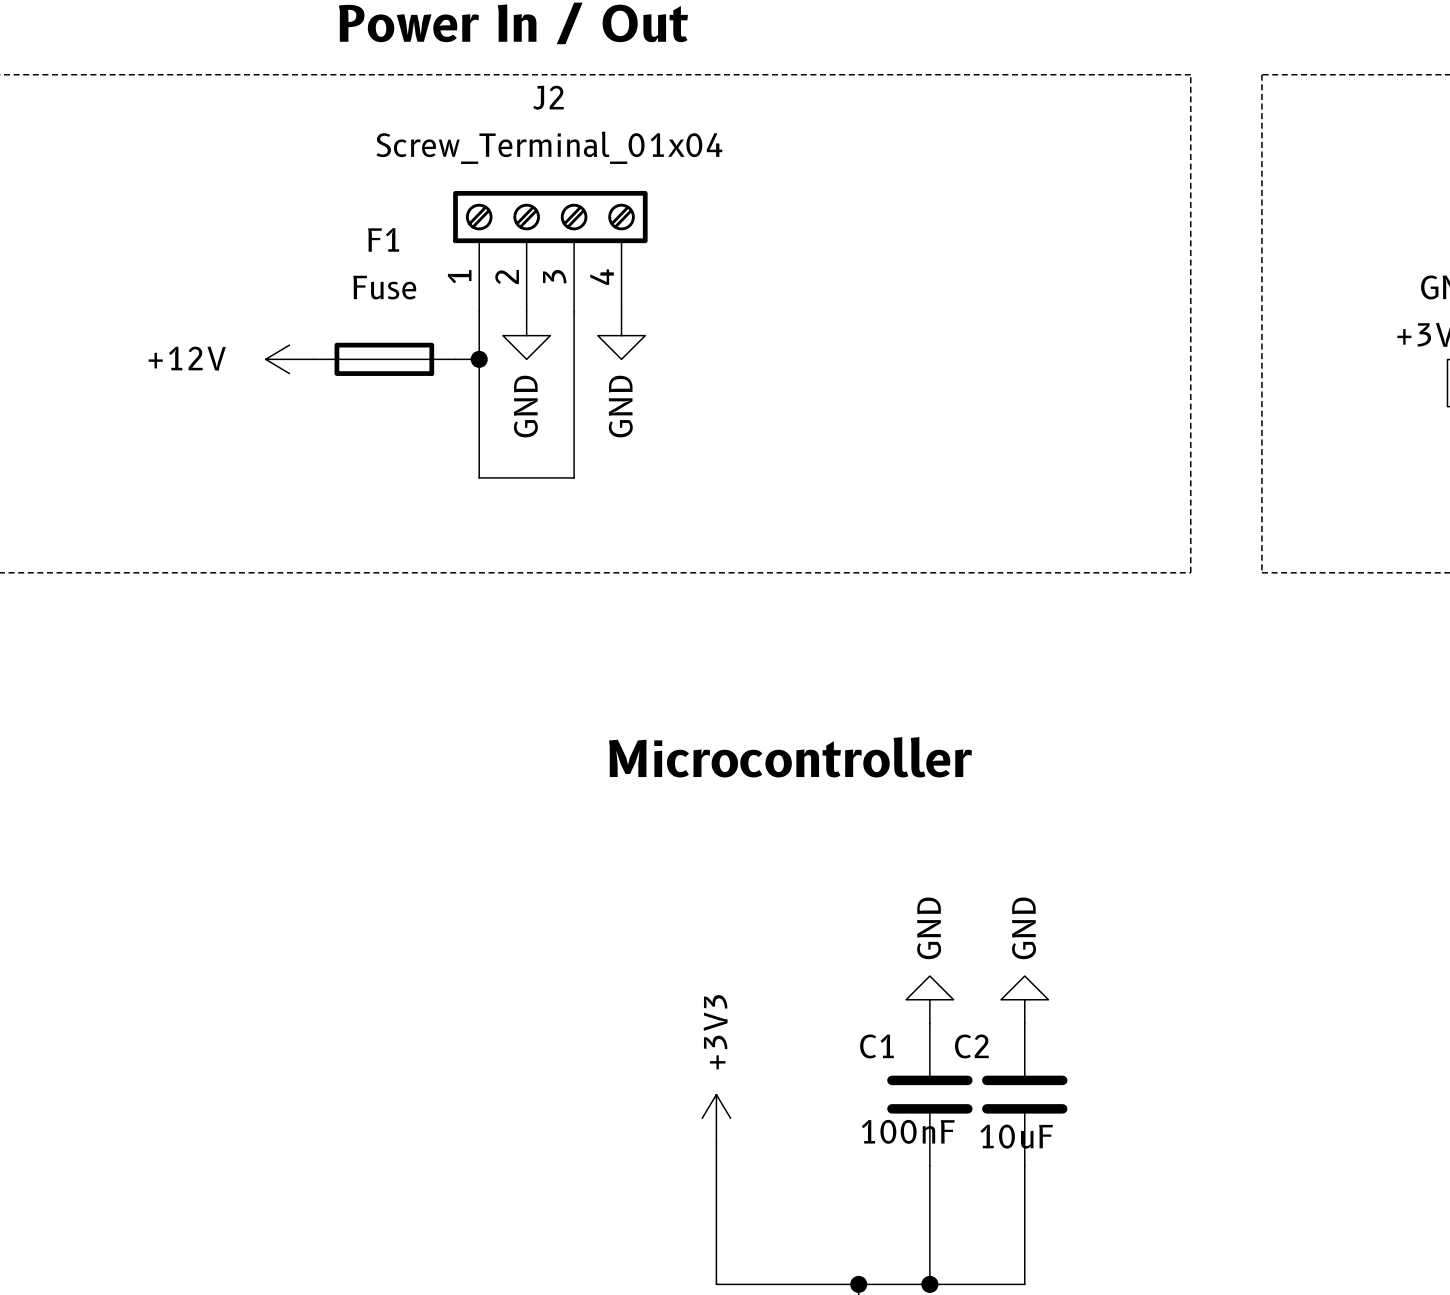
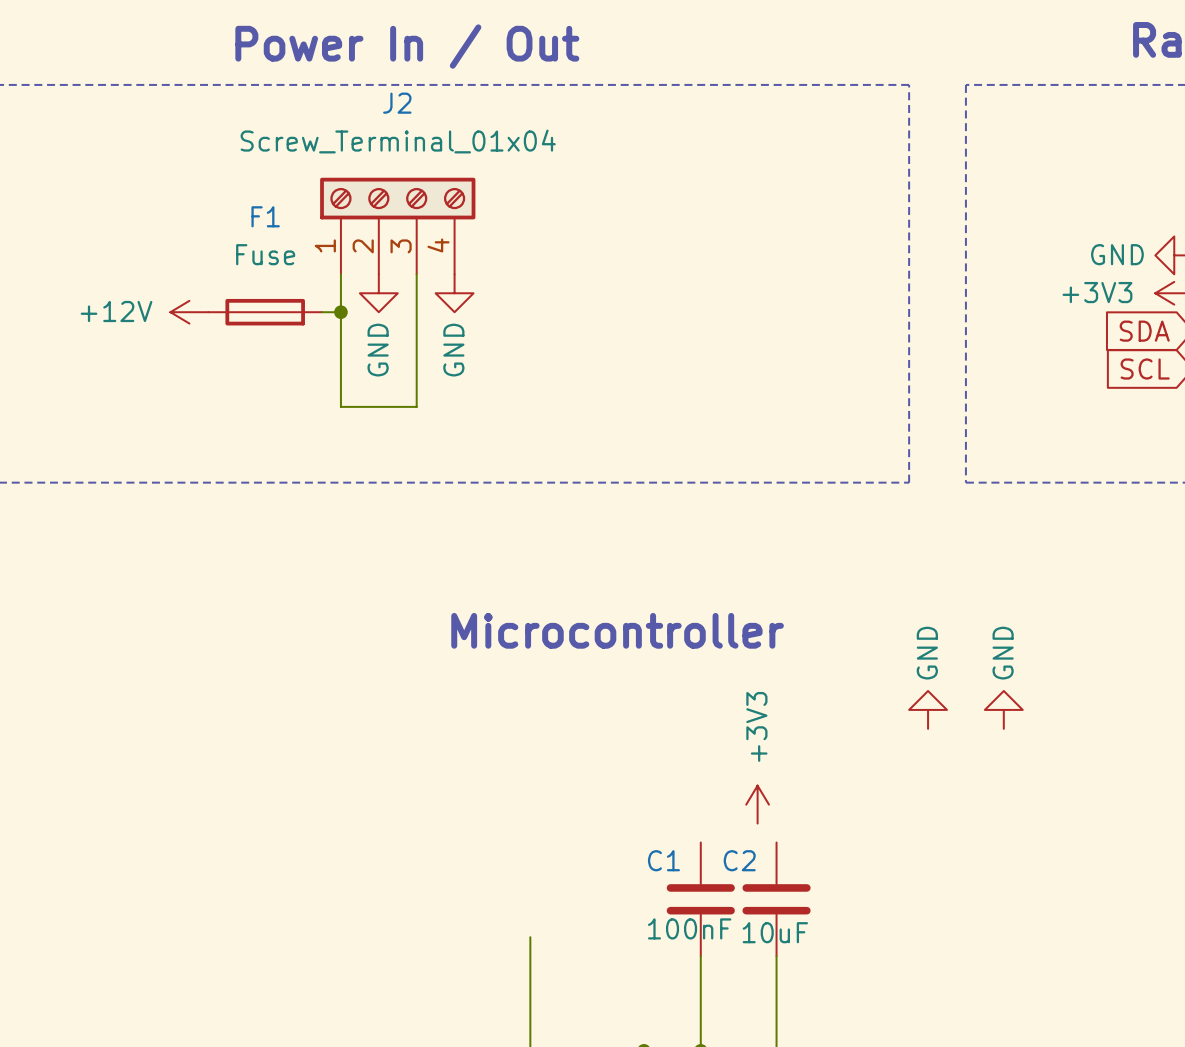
power symbol: none -> GND (928, 709)
power symbol: none -> GND (1003, 709)
power symbol: none -> +3V3 (757, 804)
power symbol: GND (929, 999) -> none
power symbol: GND (1024, 999) -> none
power symbol: +3V3 (716, 1118) -> none

